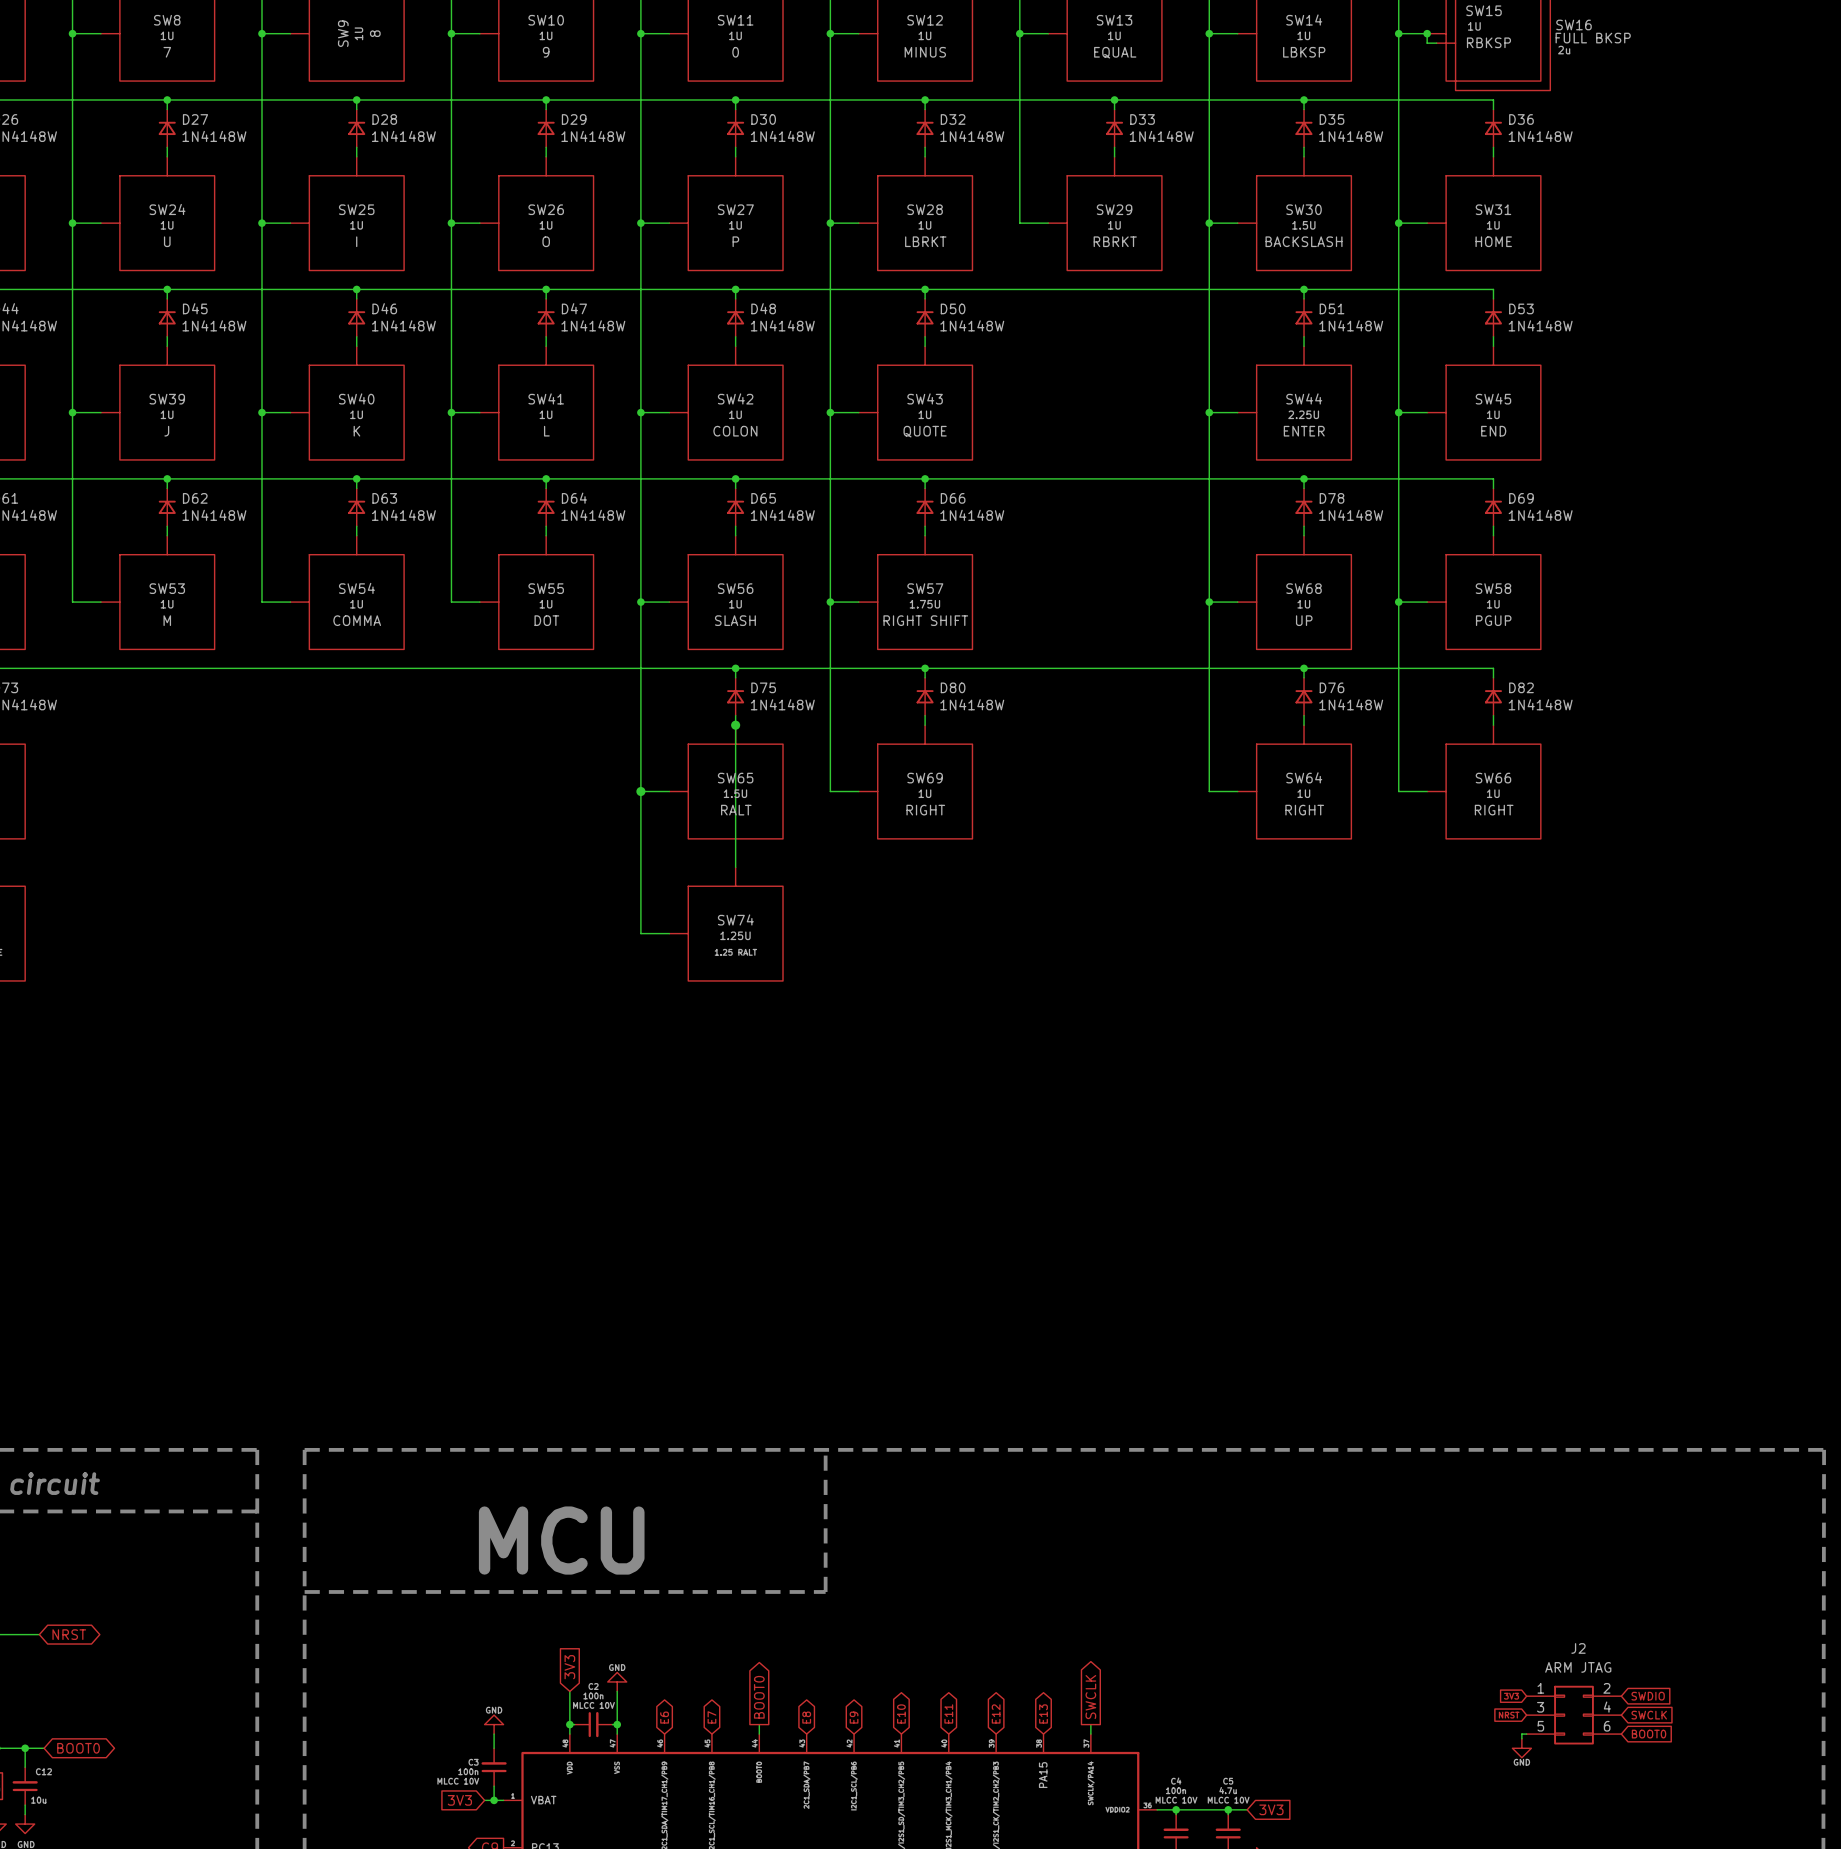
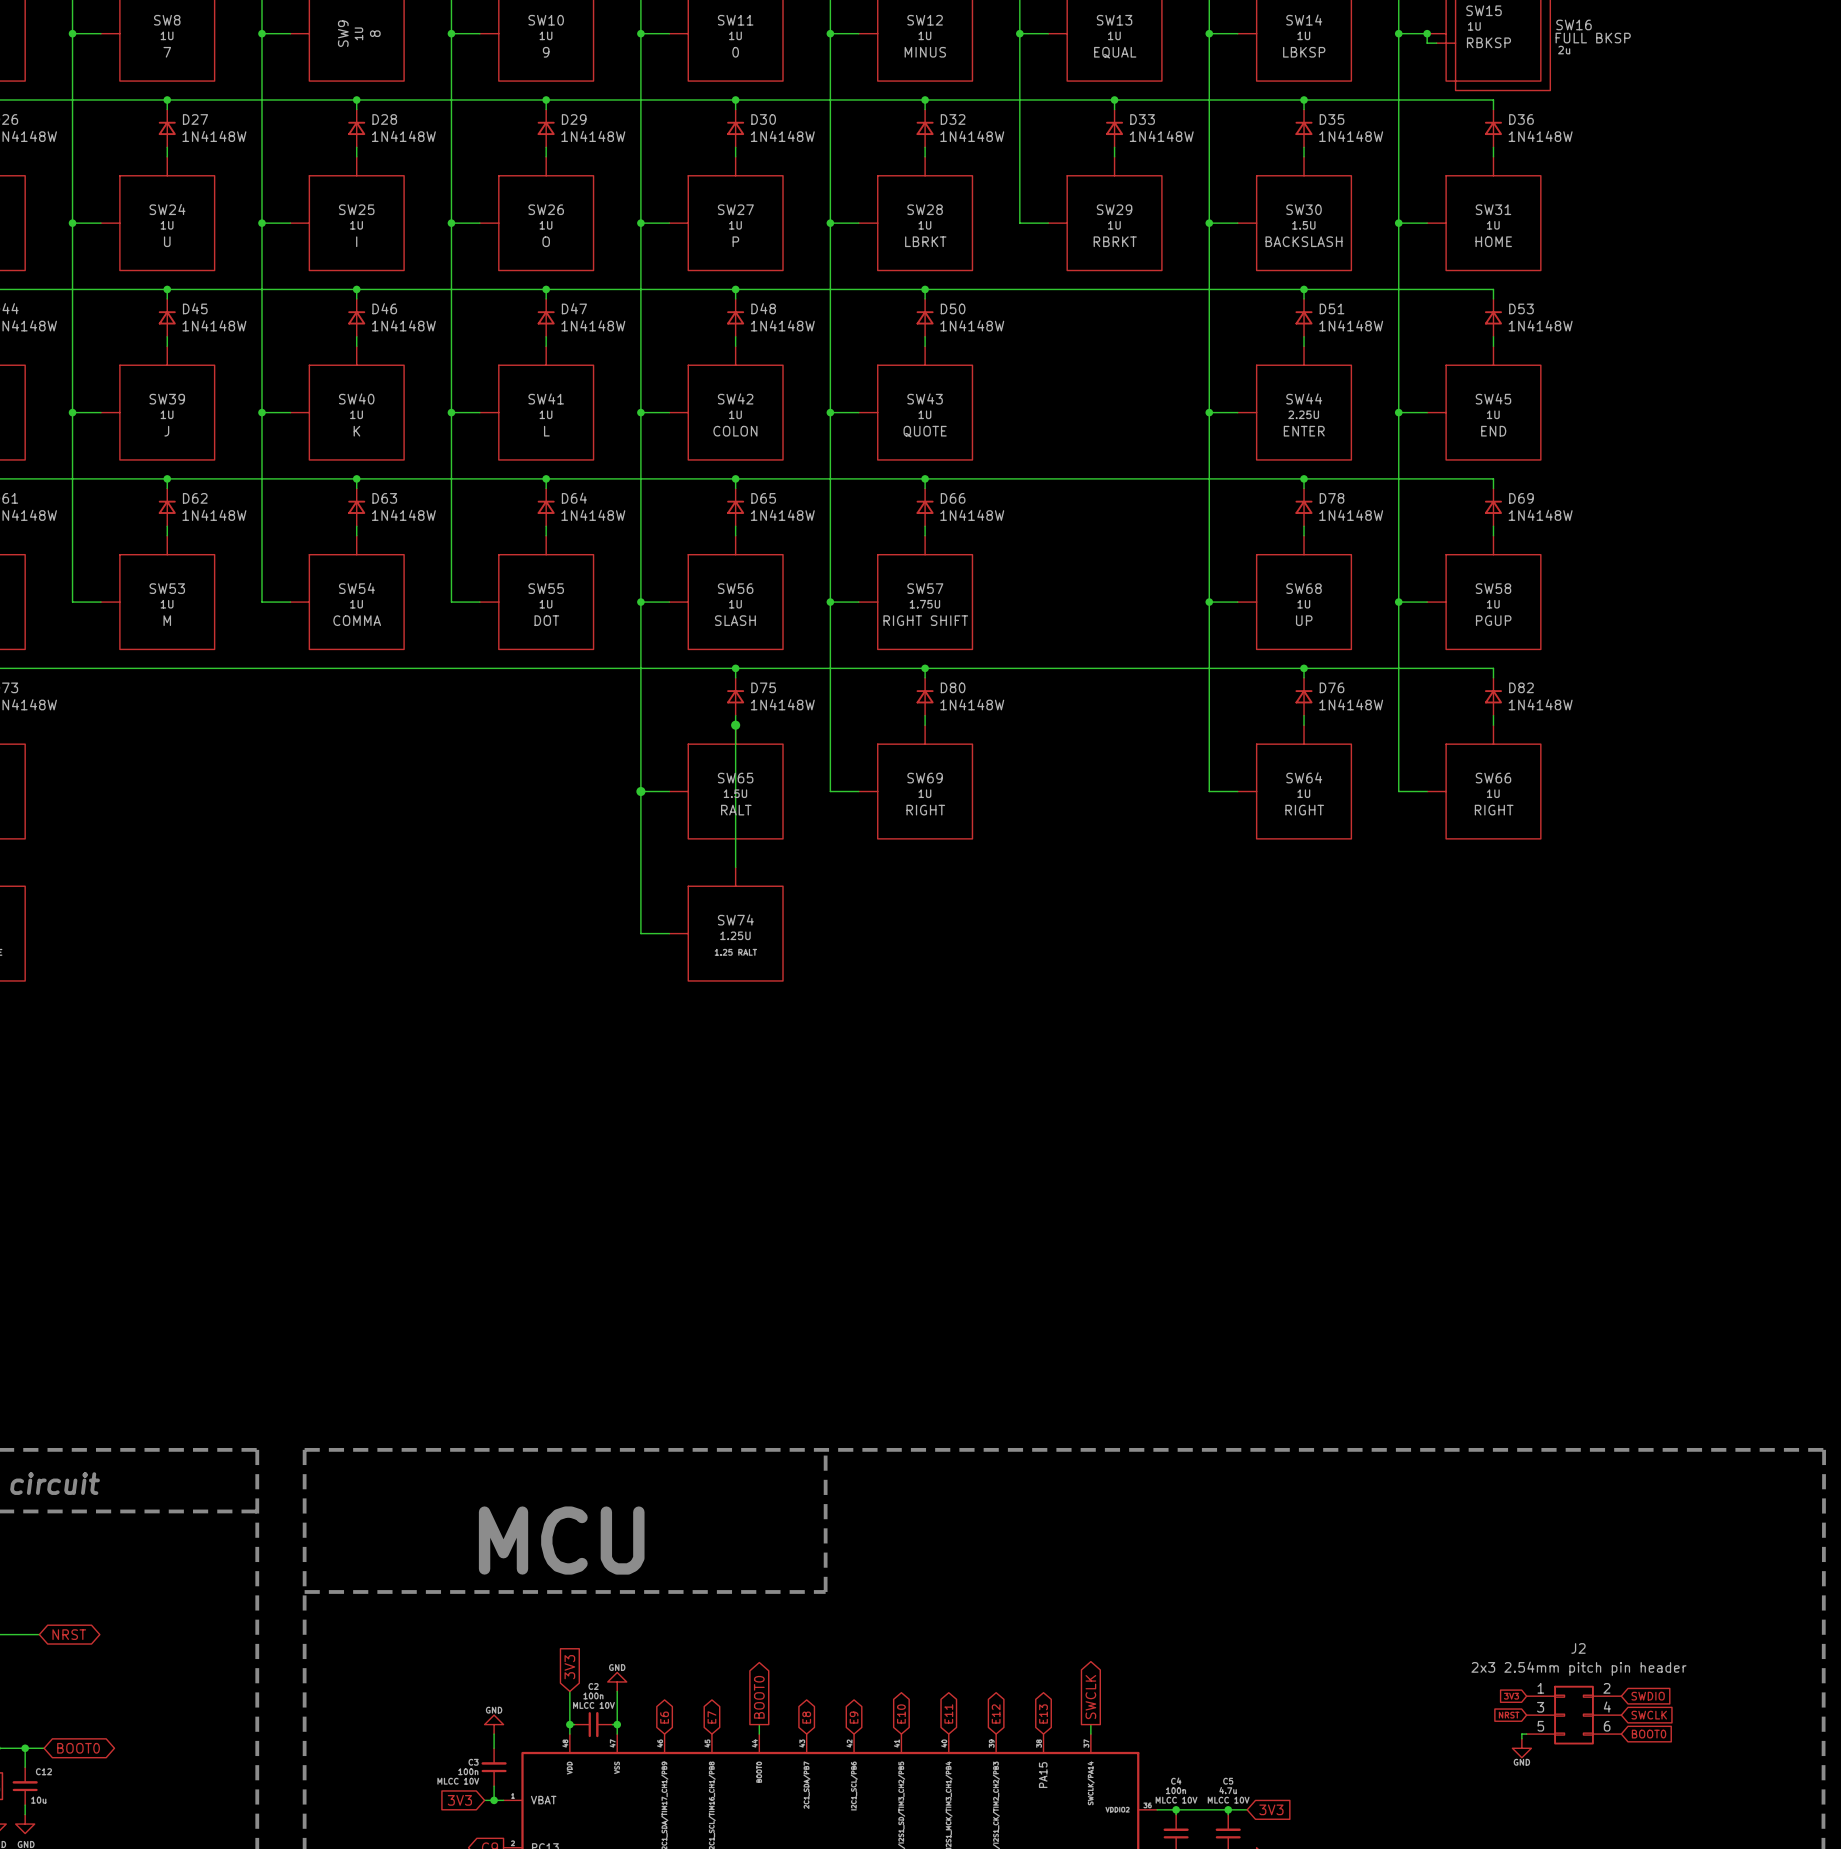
J2 value: ARM JTAG (1578, 1667) -> 2x3 2.54mm pitch pin header (1578, 1668)

